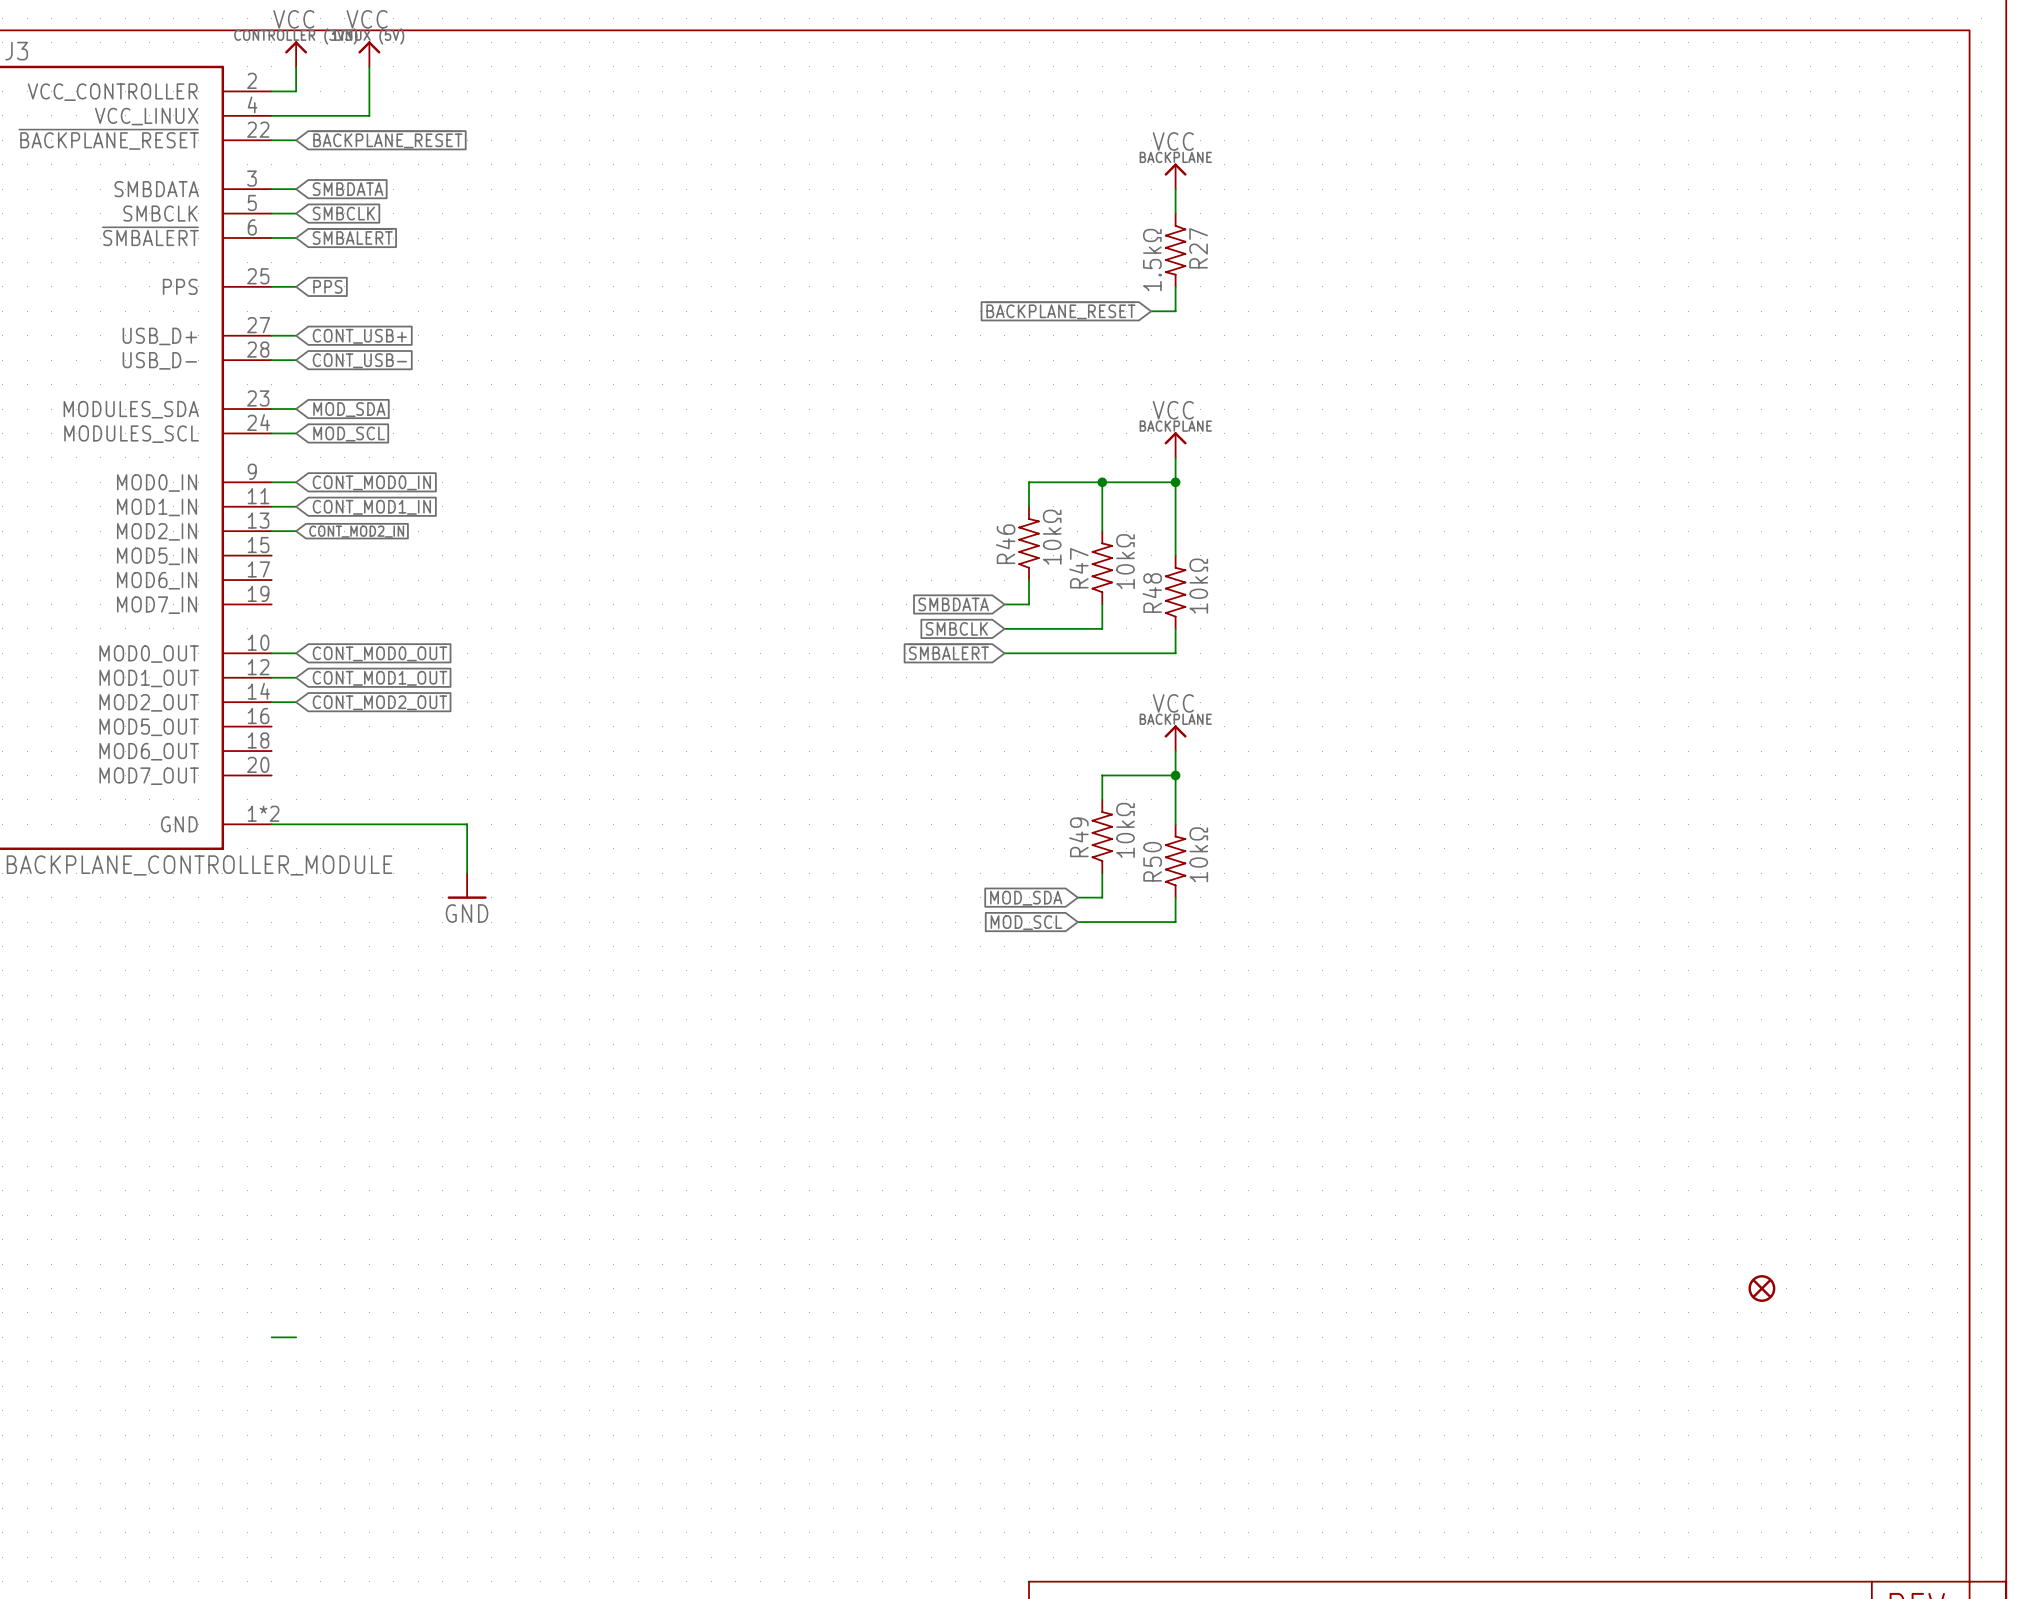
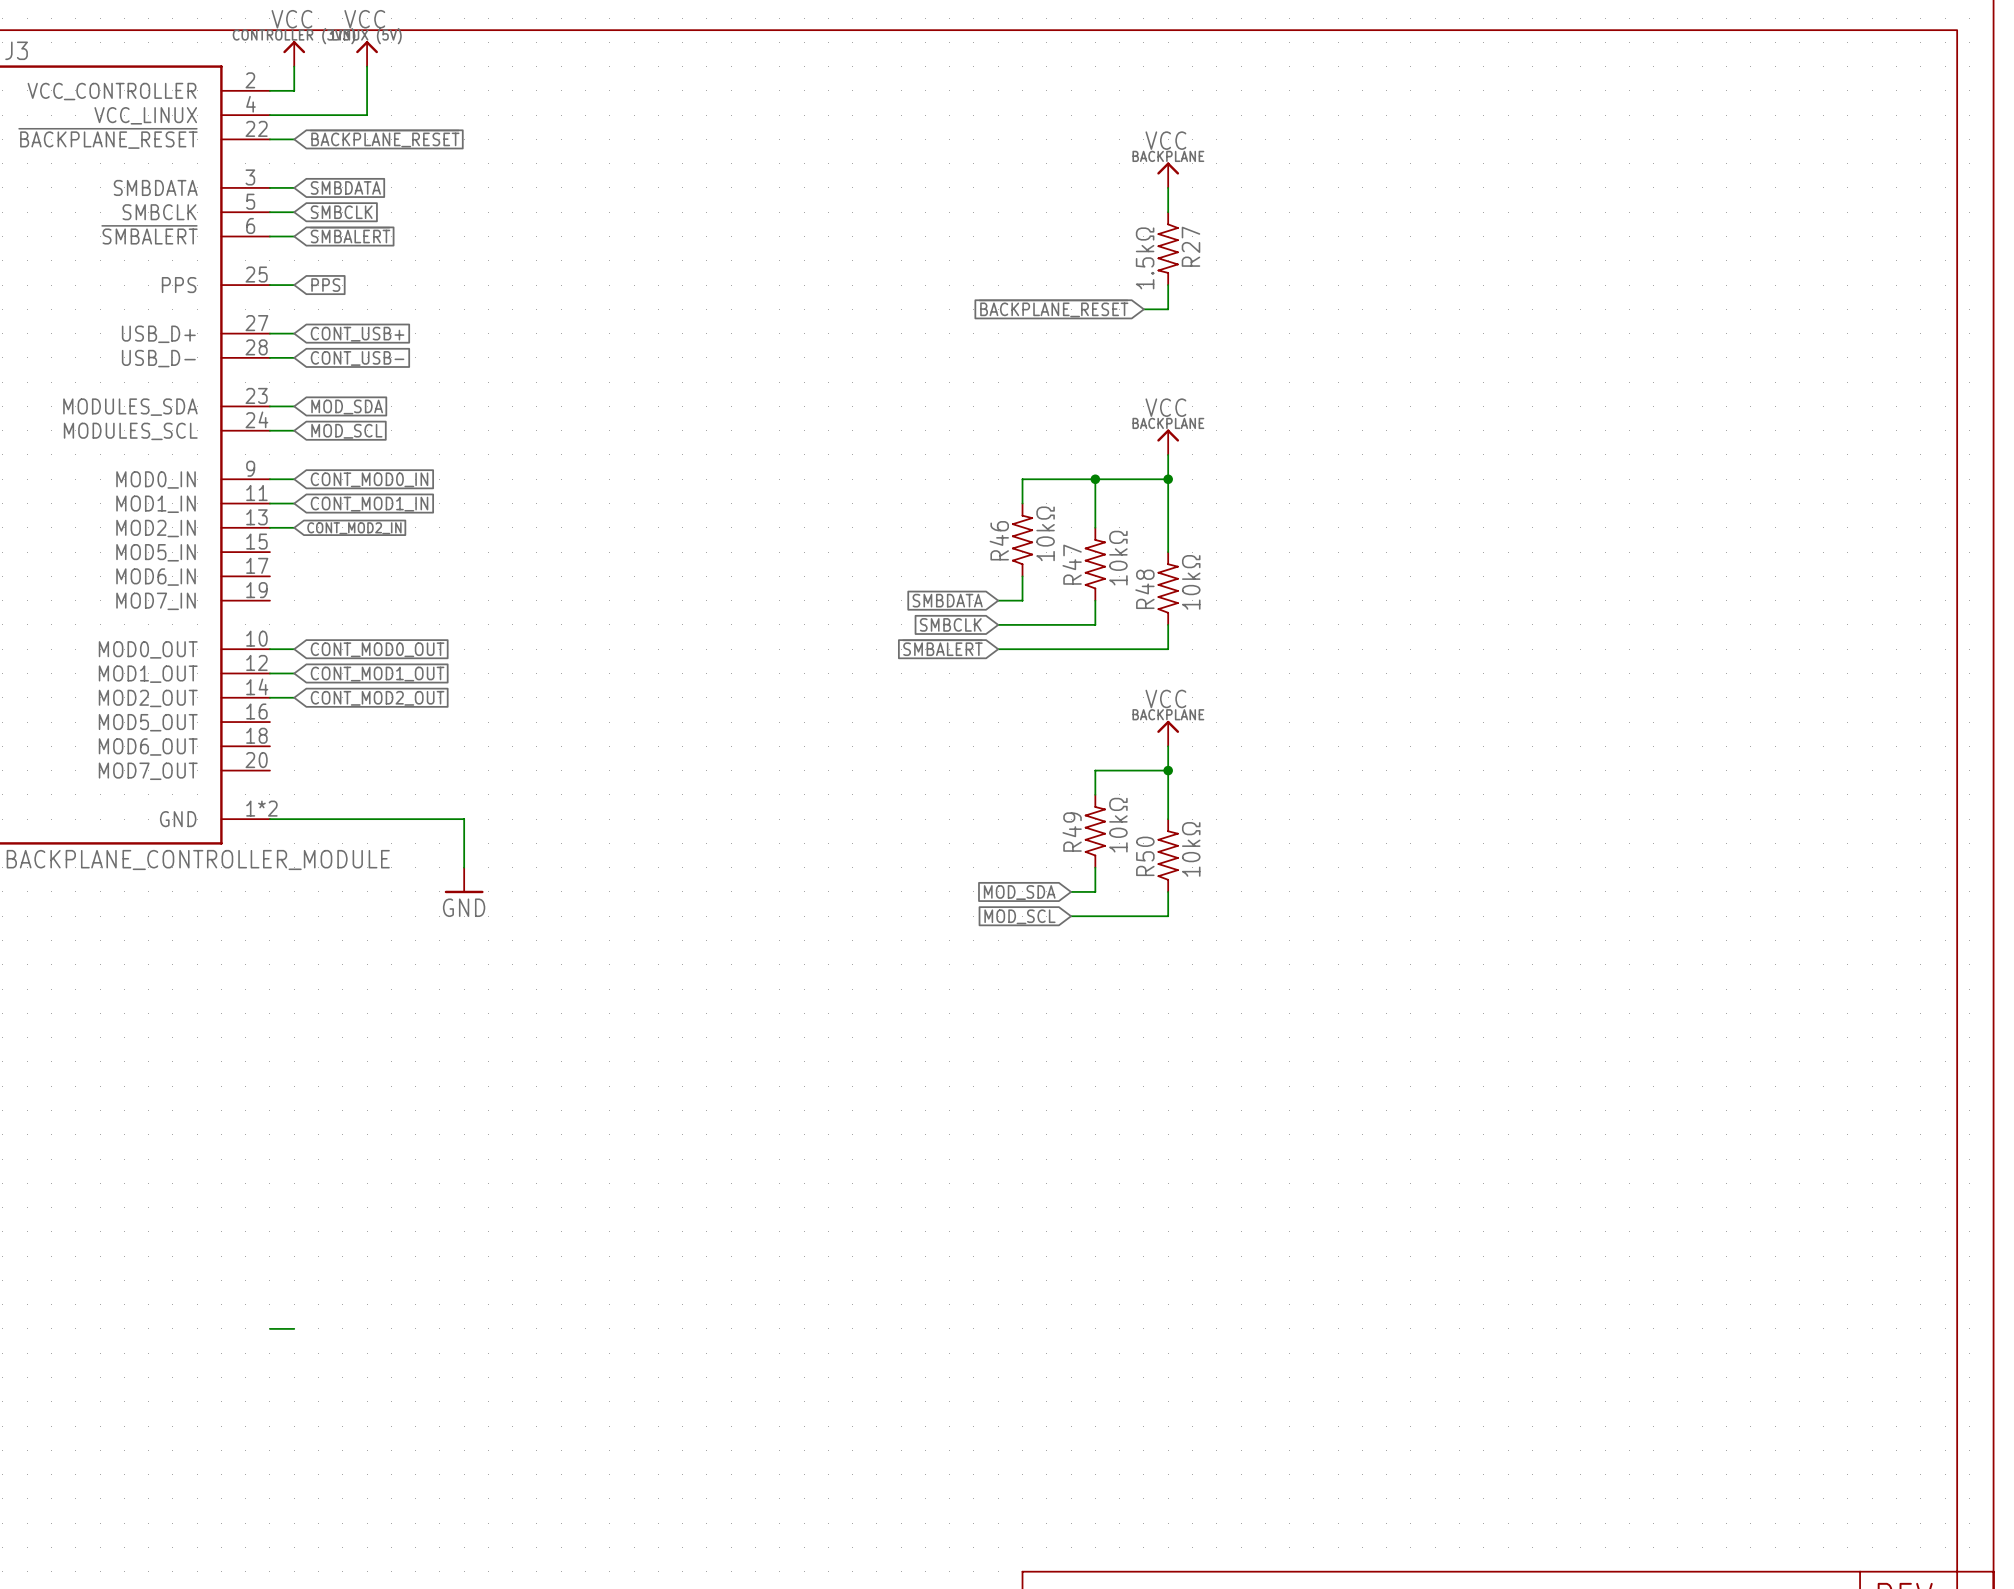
part: (1761, 1288) -> none

